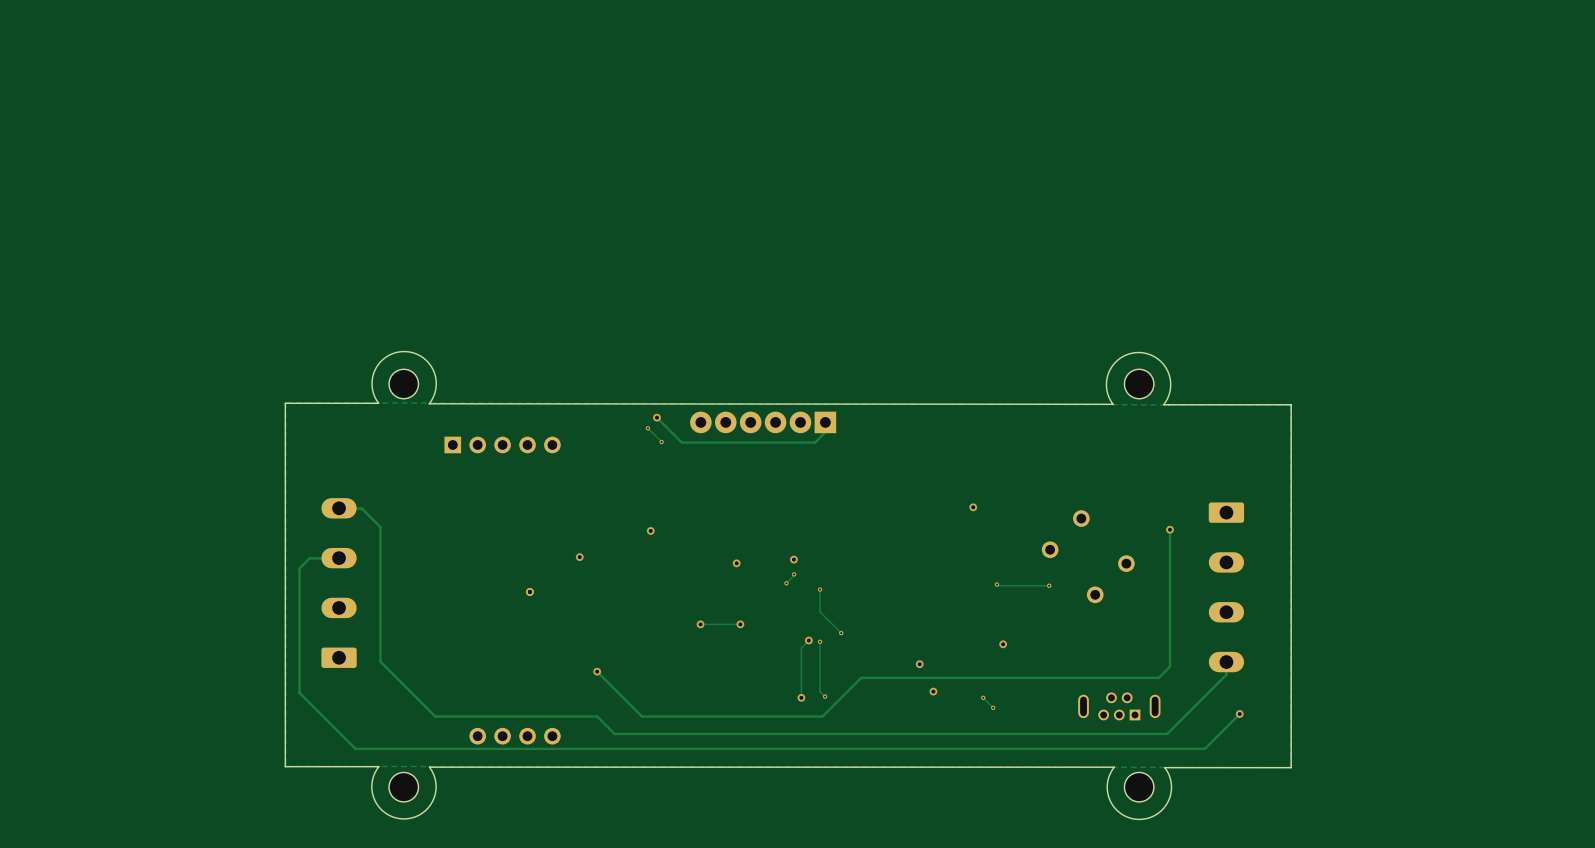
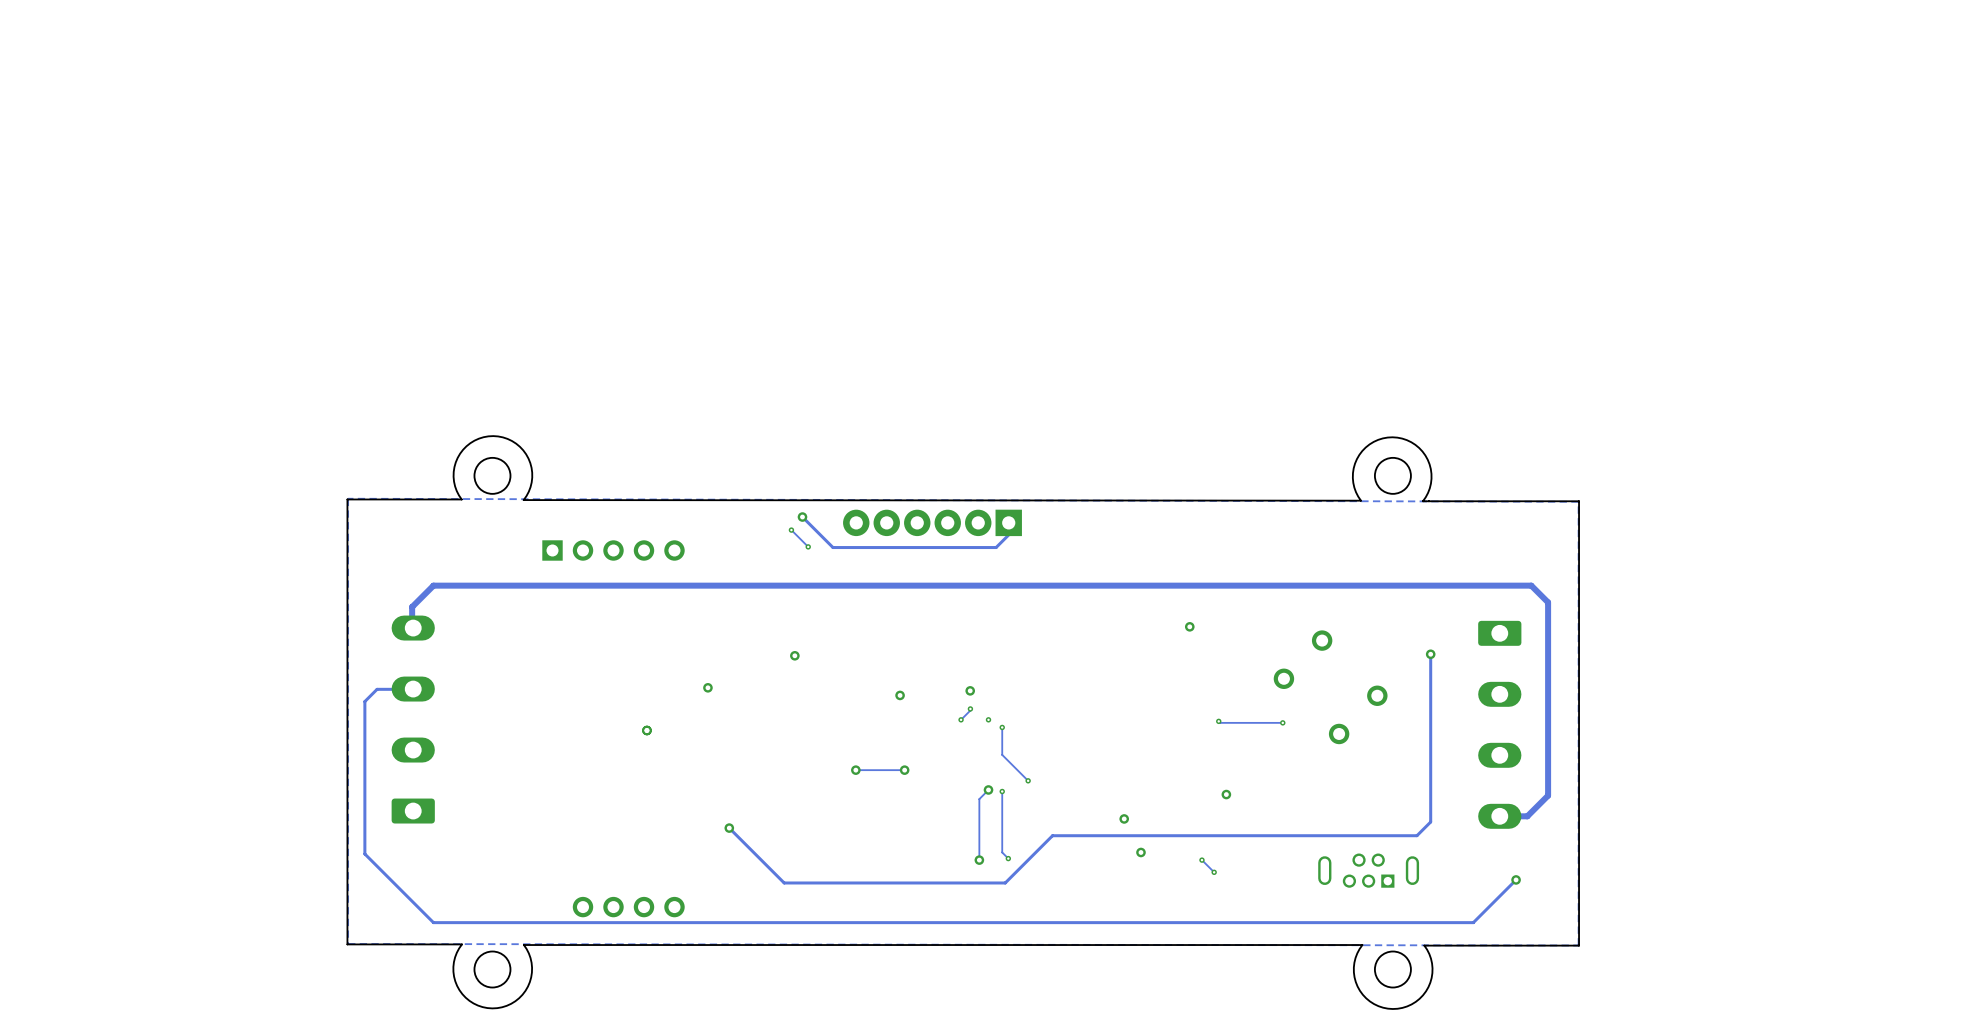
track: (340, 508) (361, 508) (380, 527) (380, 661) (435, 716) (597, 716) (614, 733) (1167, 733) (1226, 674) (1226, 662) -> (412, 631) (412, 606) (433, 585) (1531, 585) (1548, 602) (1548, 795) (1527, 816) (1499, 816)
via: none -> (988, 719)

